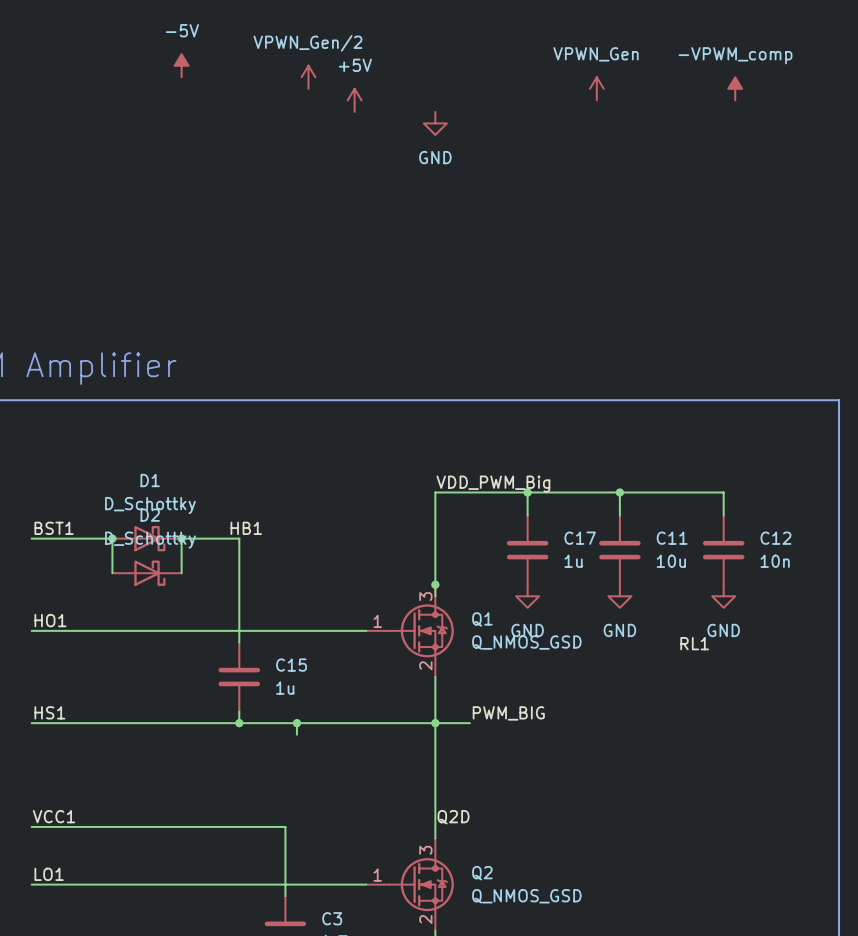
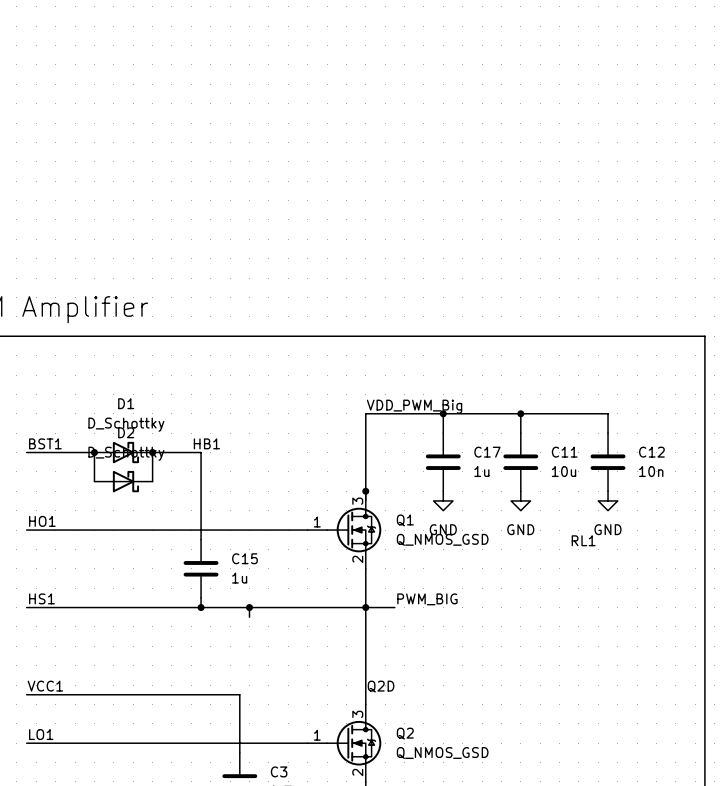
power symbol: -5V (181, 65) -> none
power symbol: VPWN_Gen/2 (308, 77) -> none
power symbol: VPWN_Gen (596, 88) -> none
power symbol: -VPWM_comp (735, 88) -> none
power symbol: +5V (354, 100) -> none
power symbol: GND (435, 123) -> none

